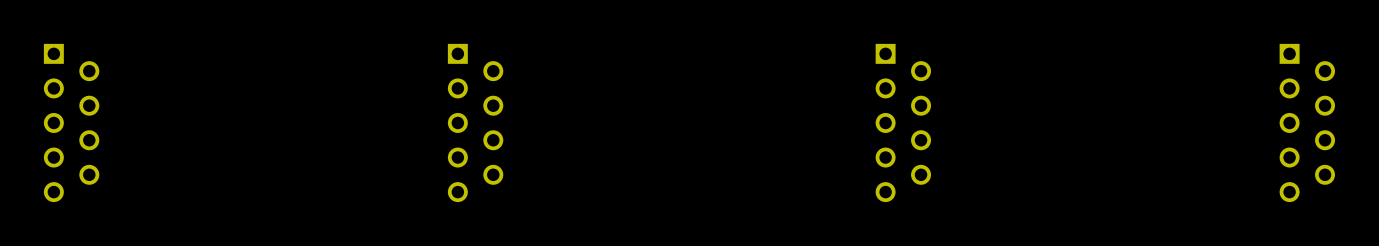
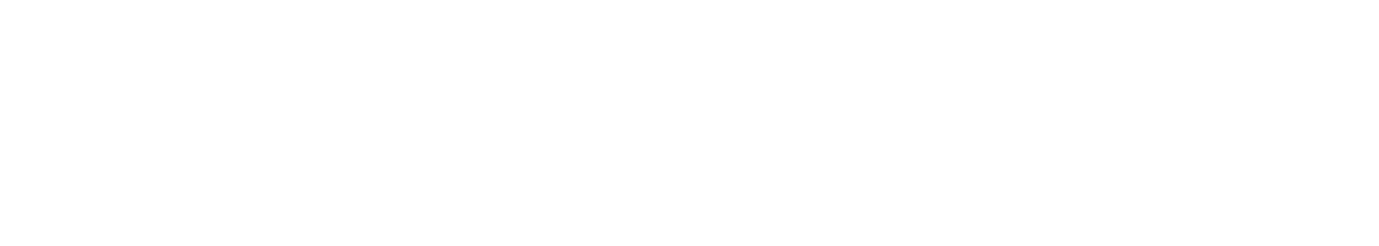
part: (71, 122) -> none
part: (475, 122) -> none
part: (903, 122) -> none
part: (1307, 122) -> none

